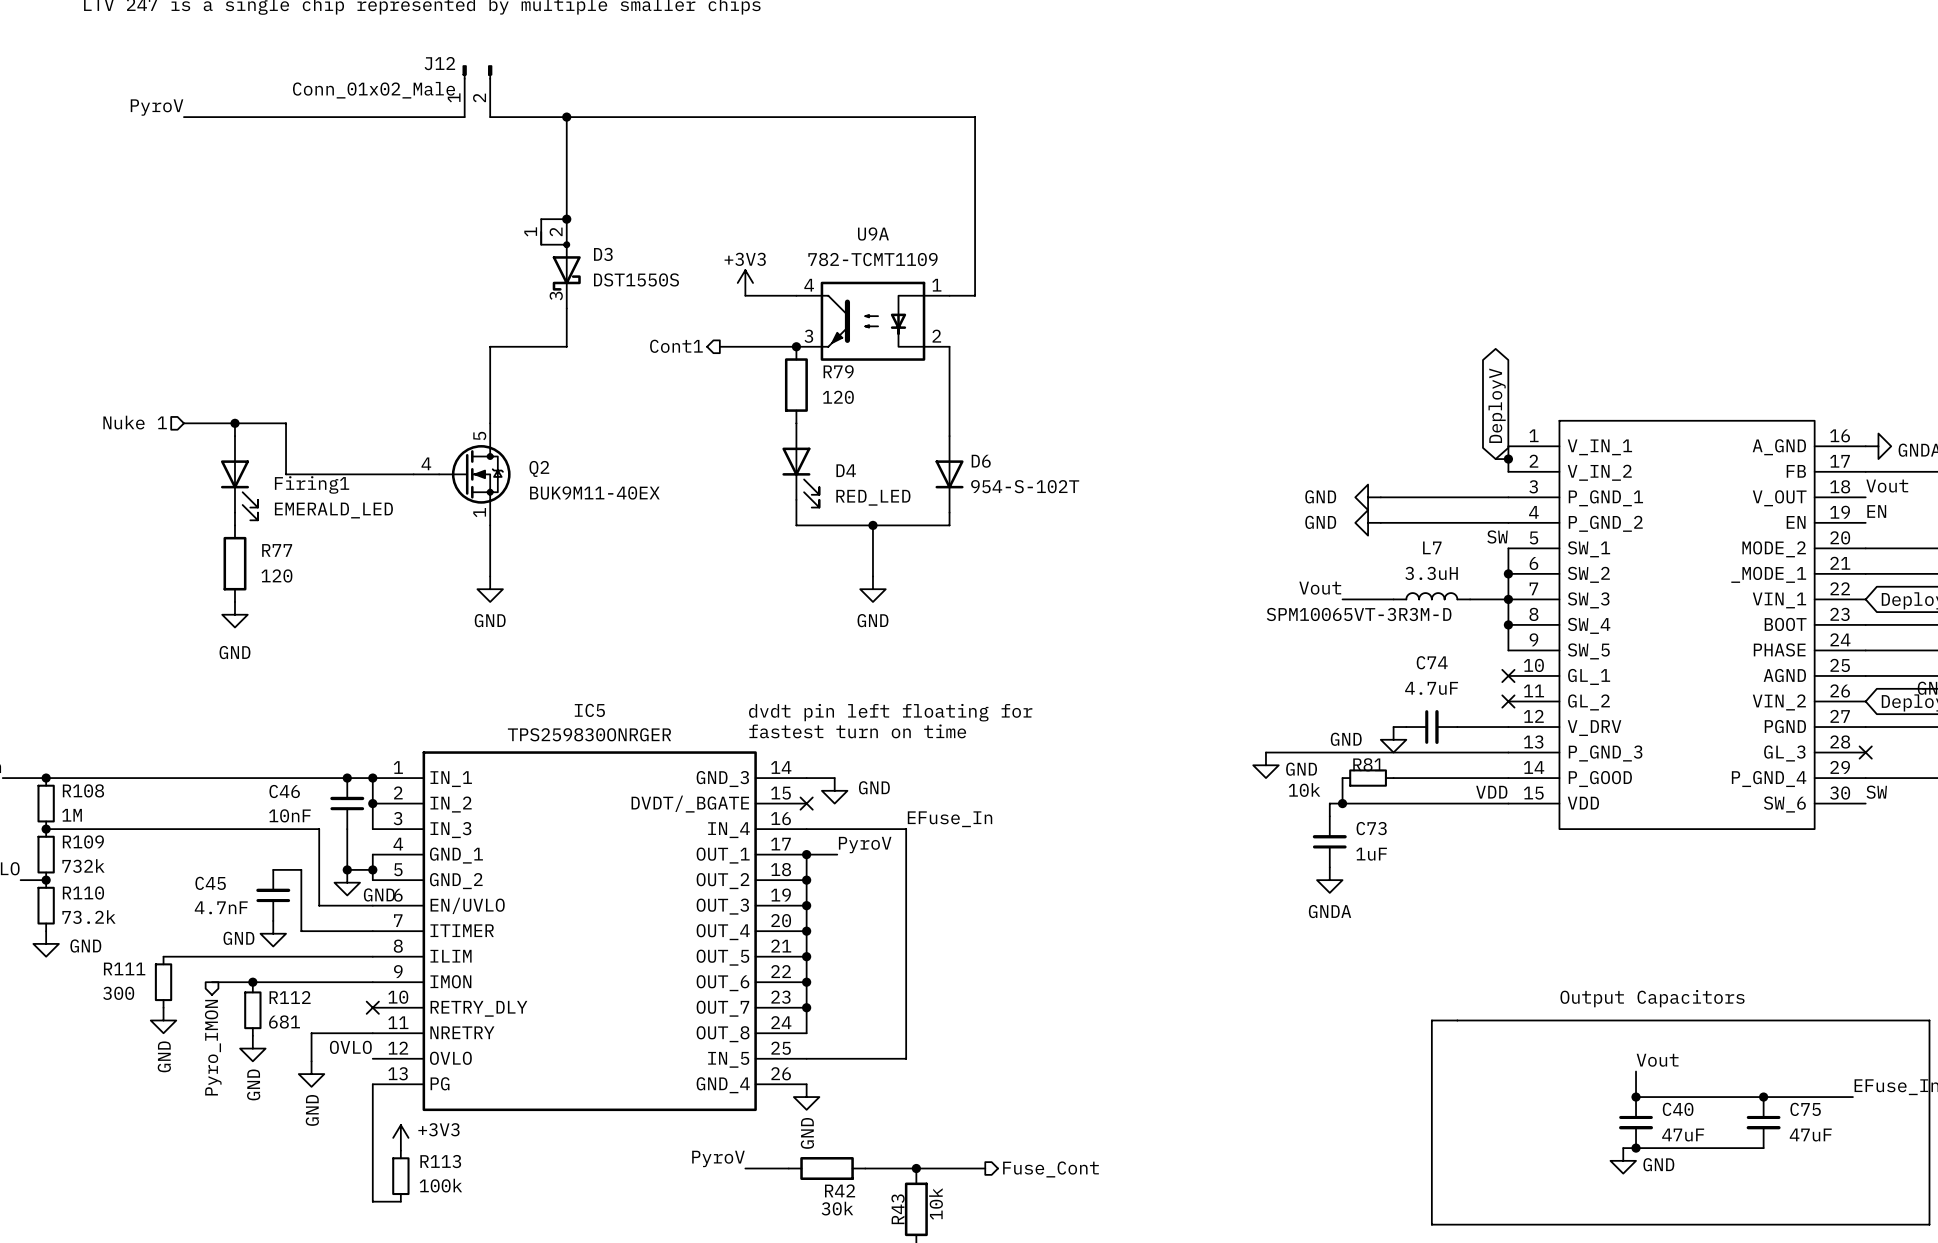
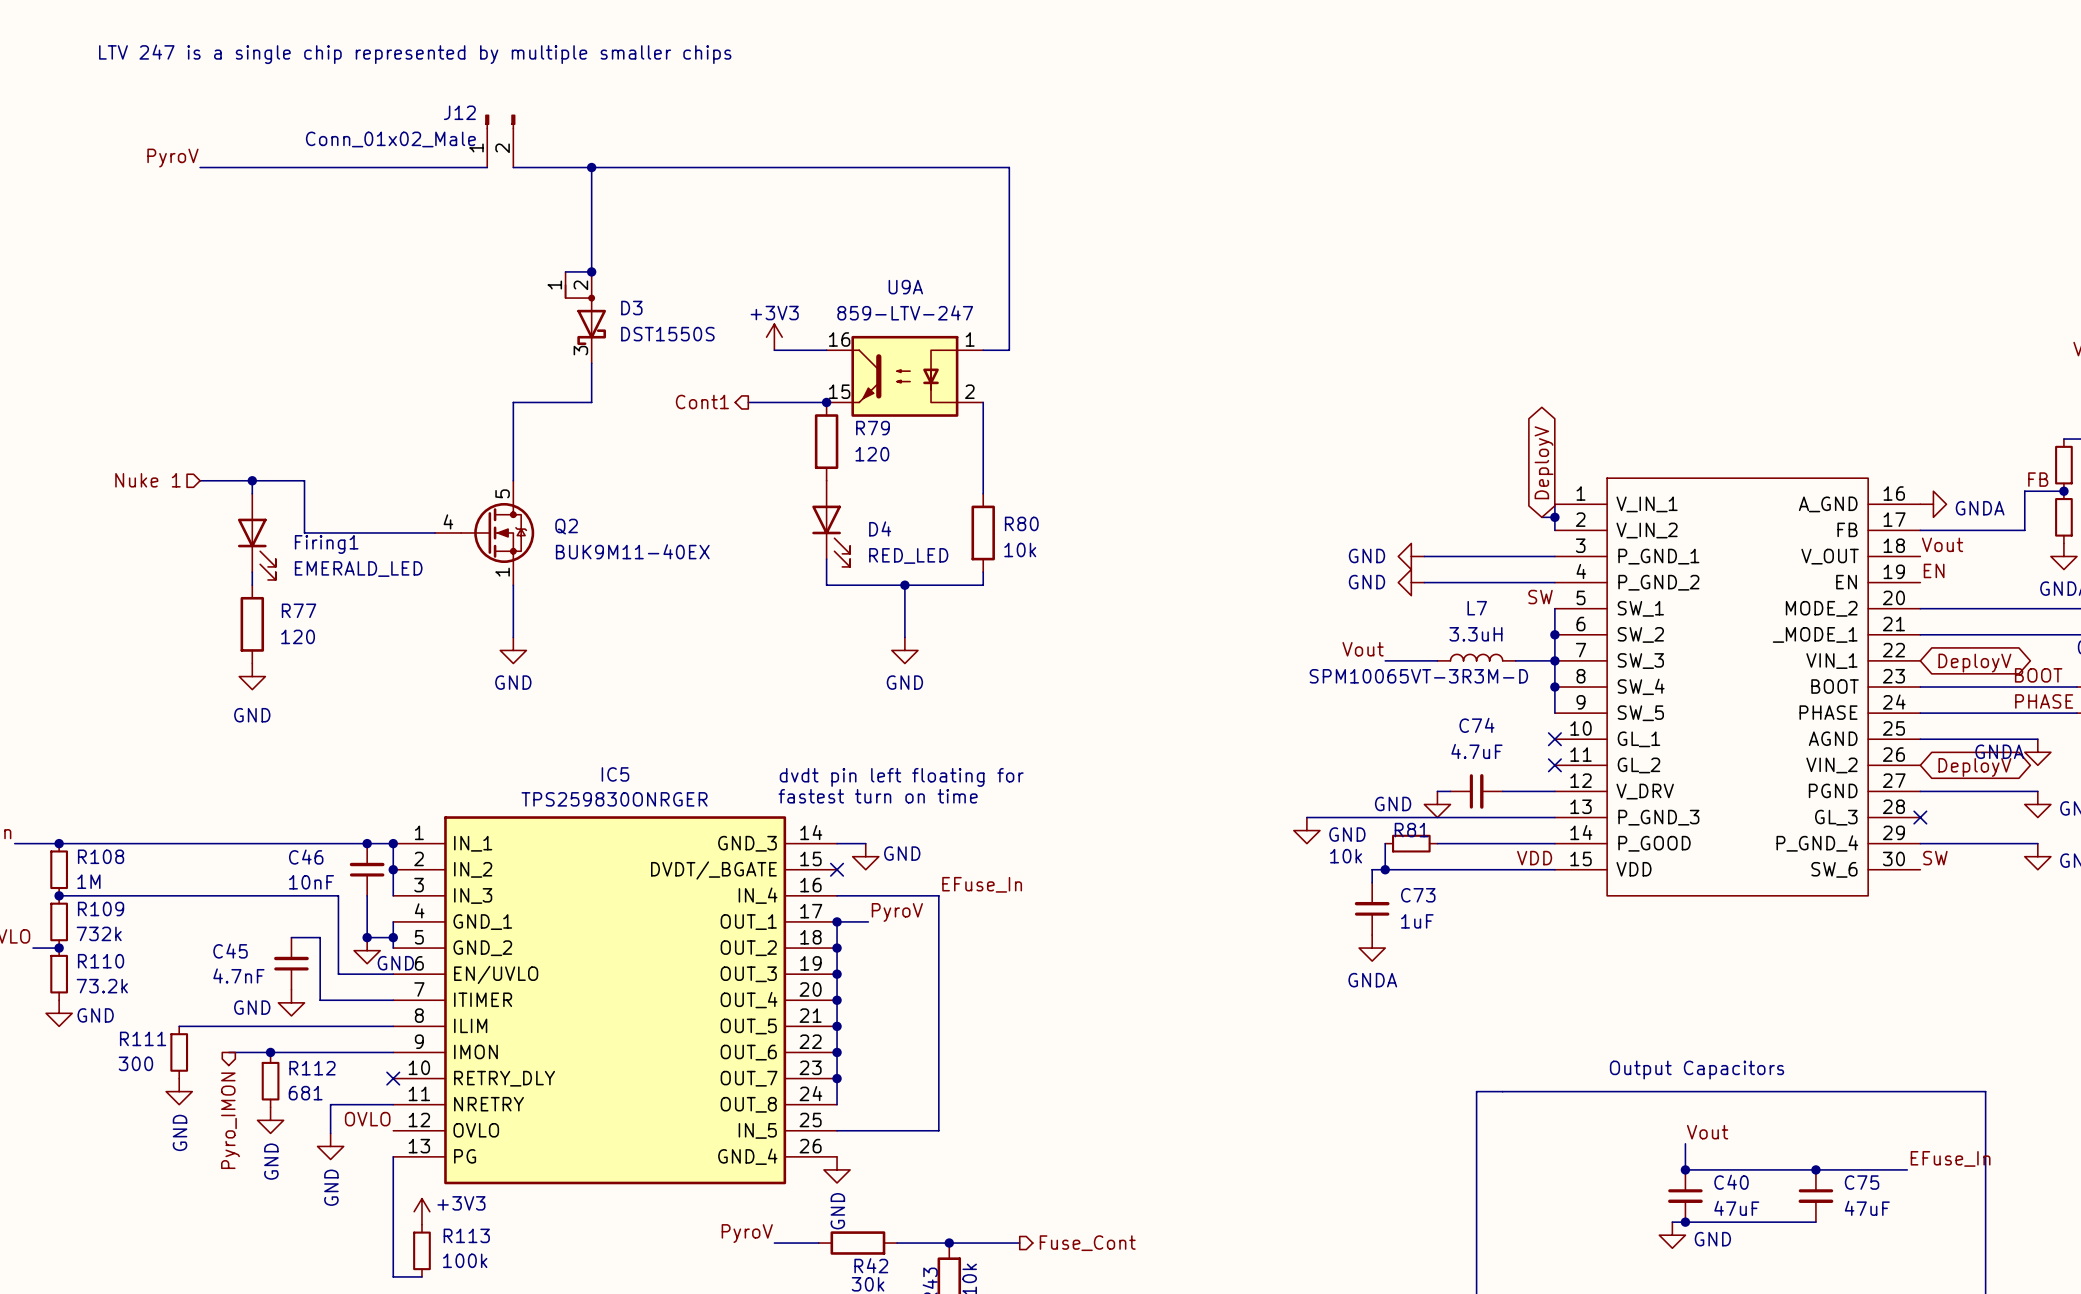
U9A value: 782-TCMT1109 (872, 259) -> 859-LTV-247 (905, 312)
U9A pin number: 4 (809, 285) -> 16 (839, 339)
U9A pin number: 3 (808, 336) -> 15 (839, 391)
D6: 954-S-102T (949, 474) -> none
R80: none -> 10k (983, 532)

